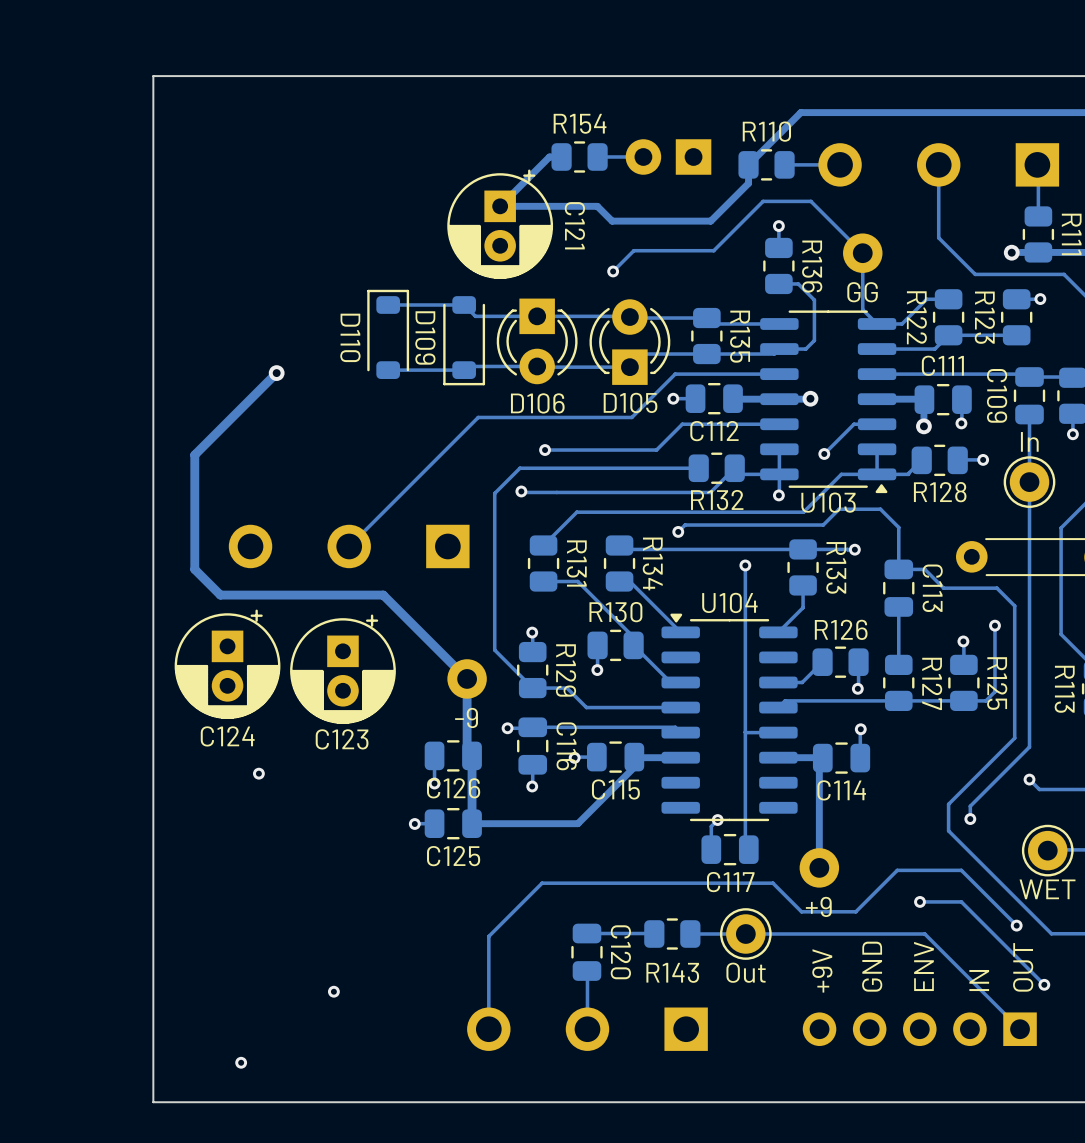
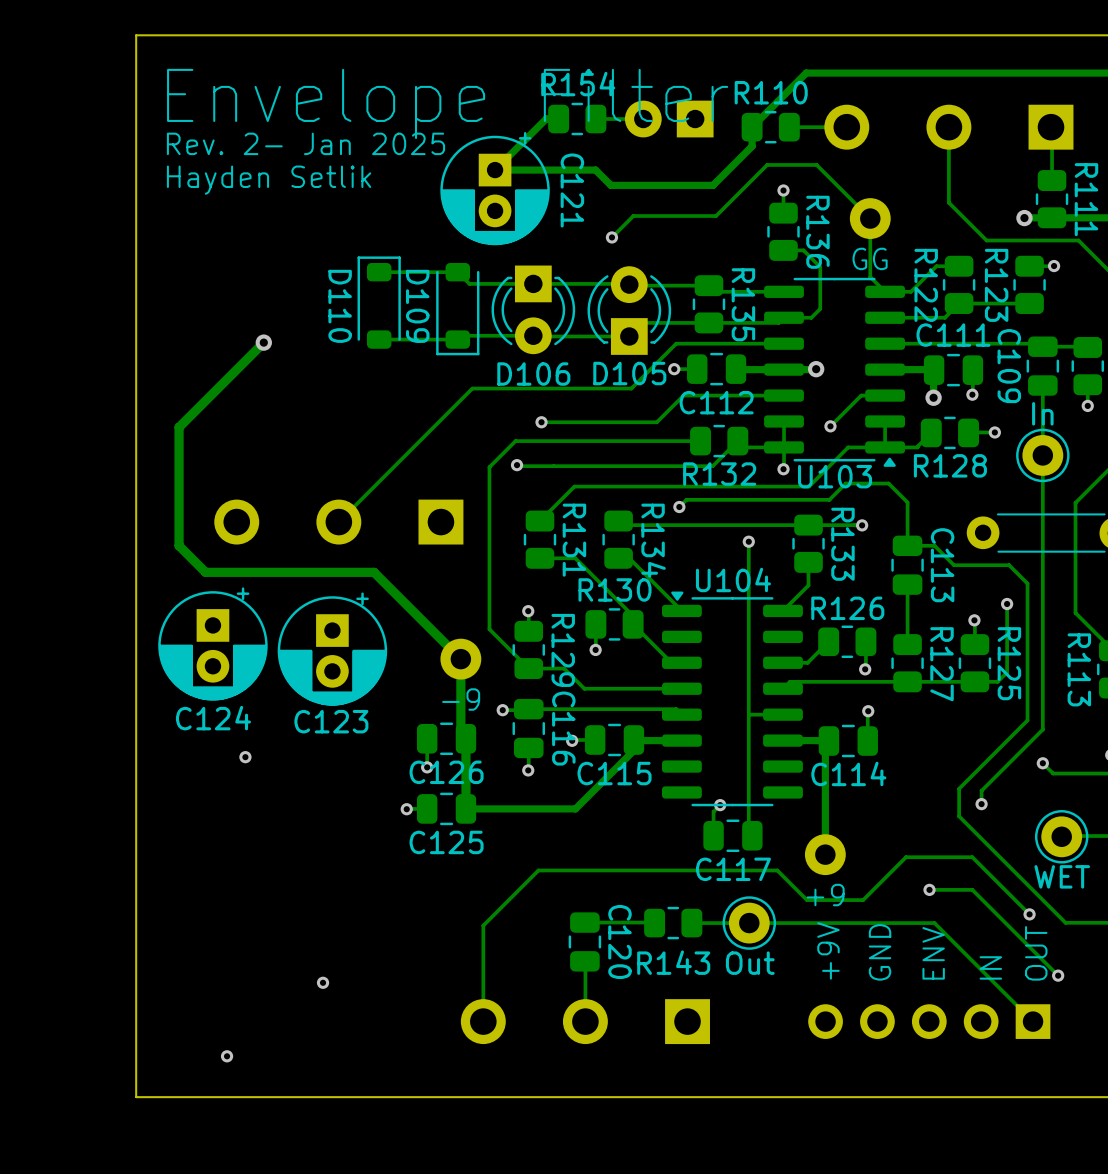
text: none -> Envelope Filter (447, 103)
text: none -> Rev. 2- Jan 2025 (305, 143)
text: none -> Hayden Setlik (269, 180)

